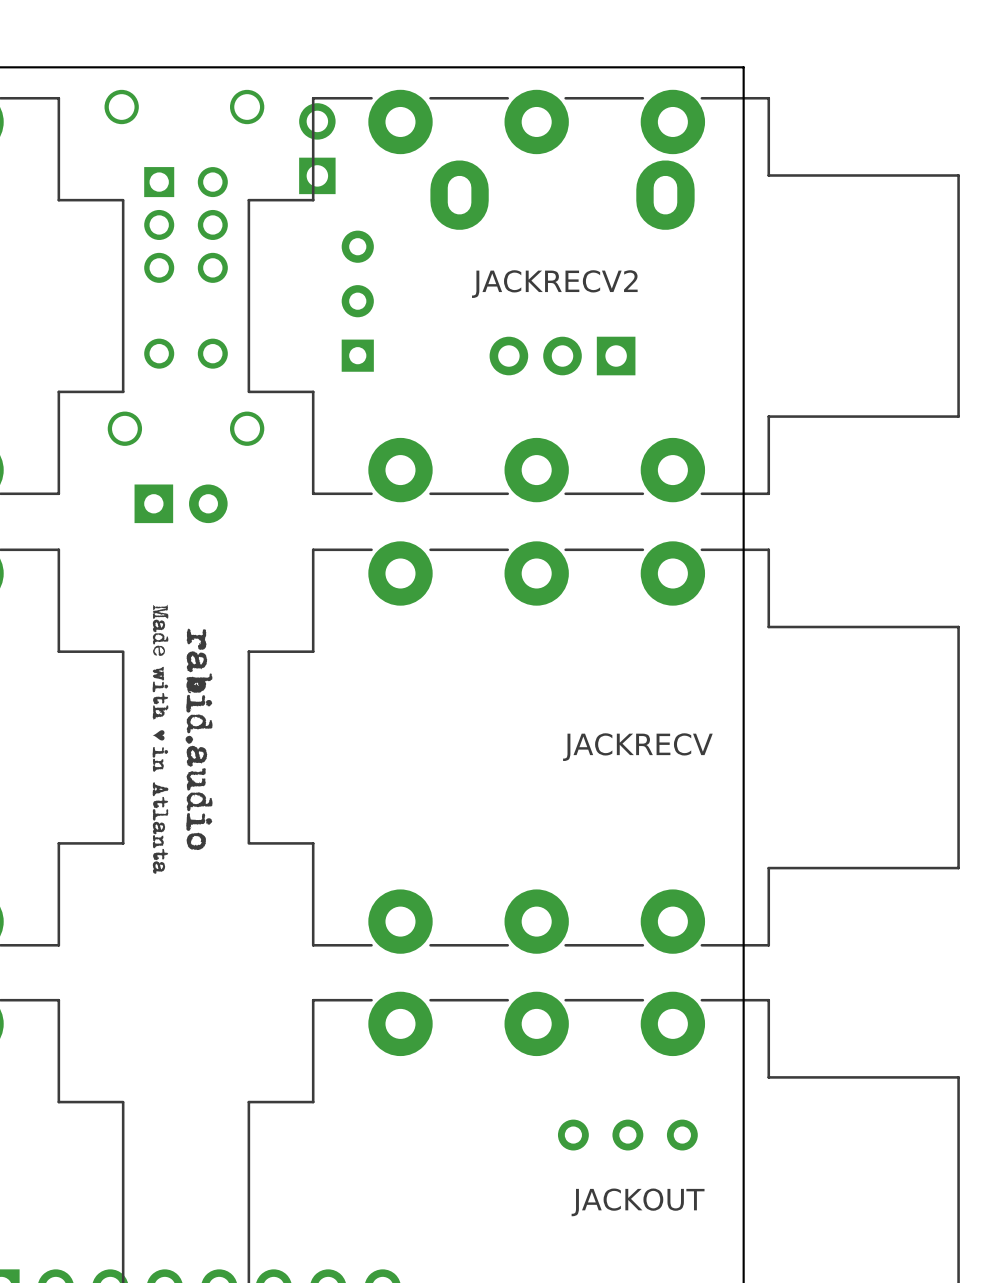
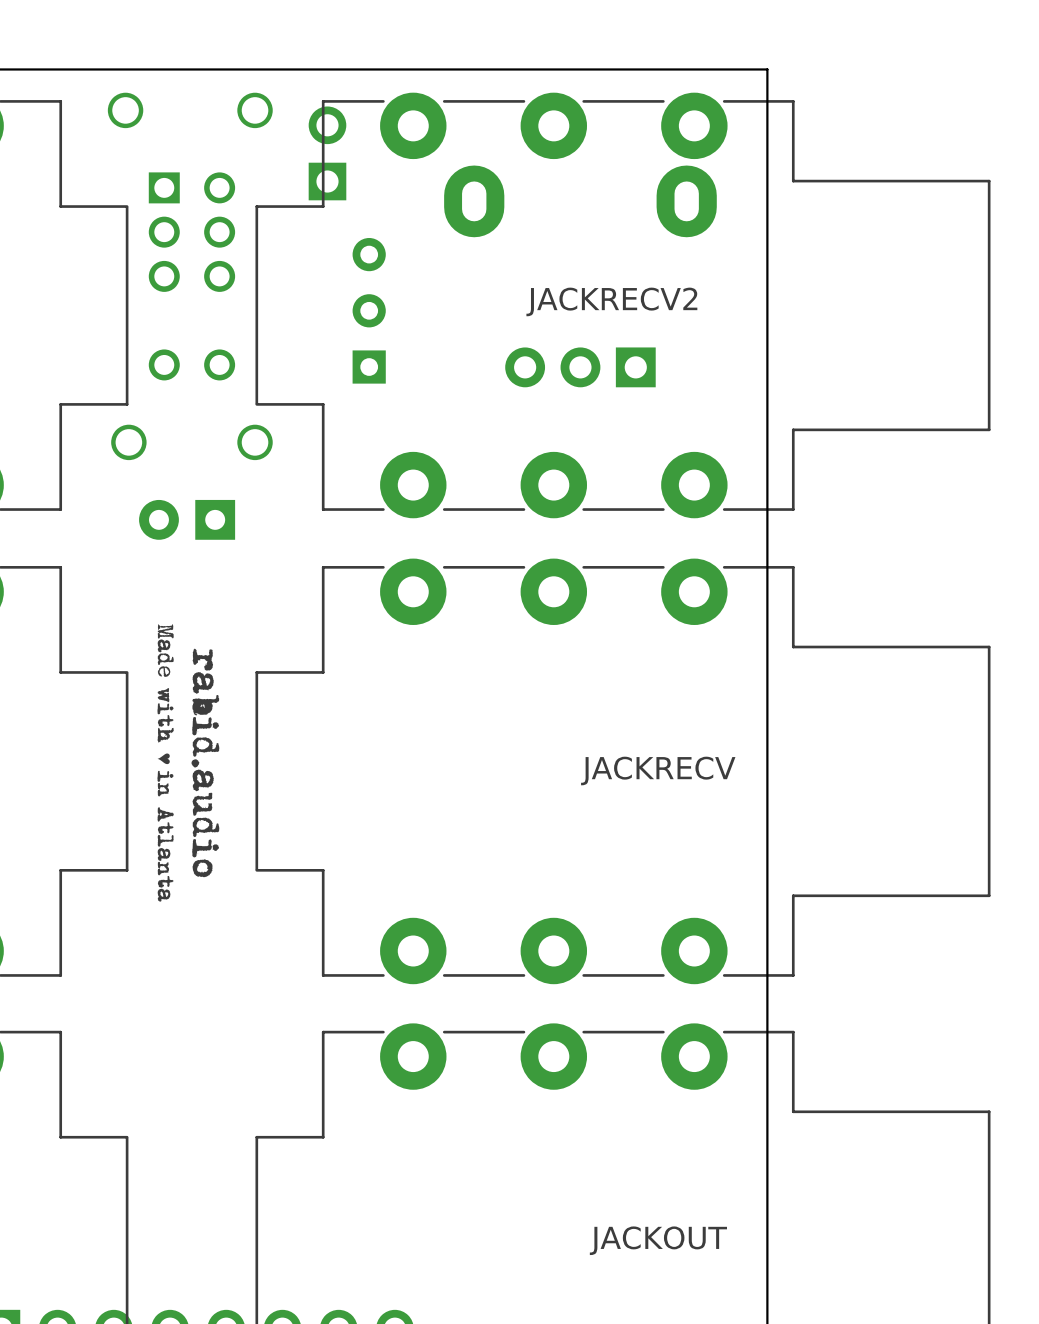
part value position: JACKRECV2 (554, 284) -> JACKRECV2 (611, 301)
part rotation: 0° (181, 503) -> 180° (187, 519)
part: (627, 1135) -> none

